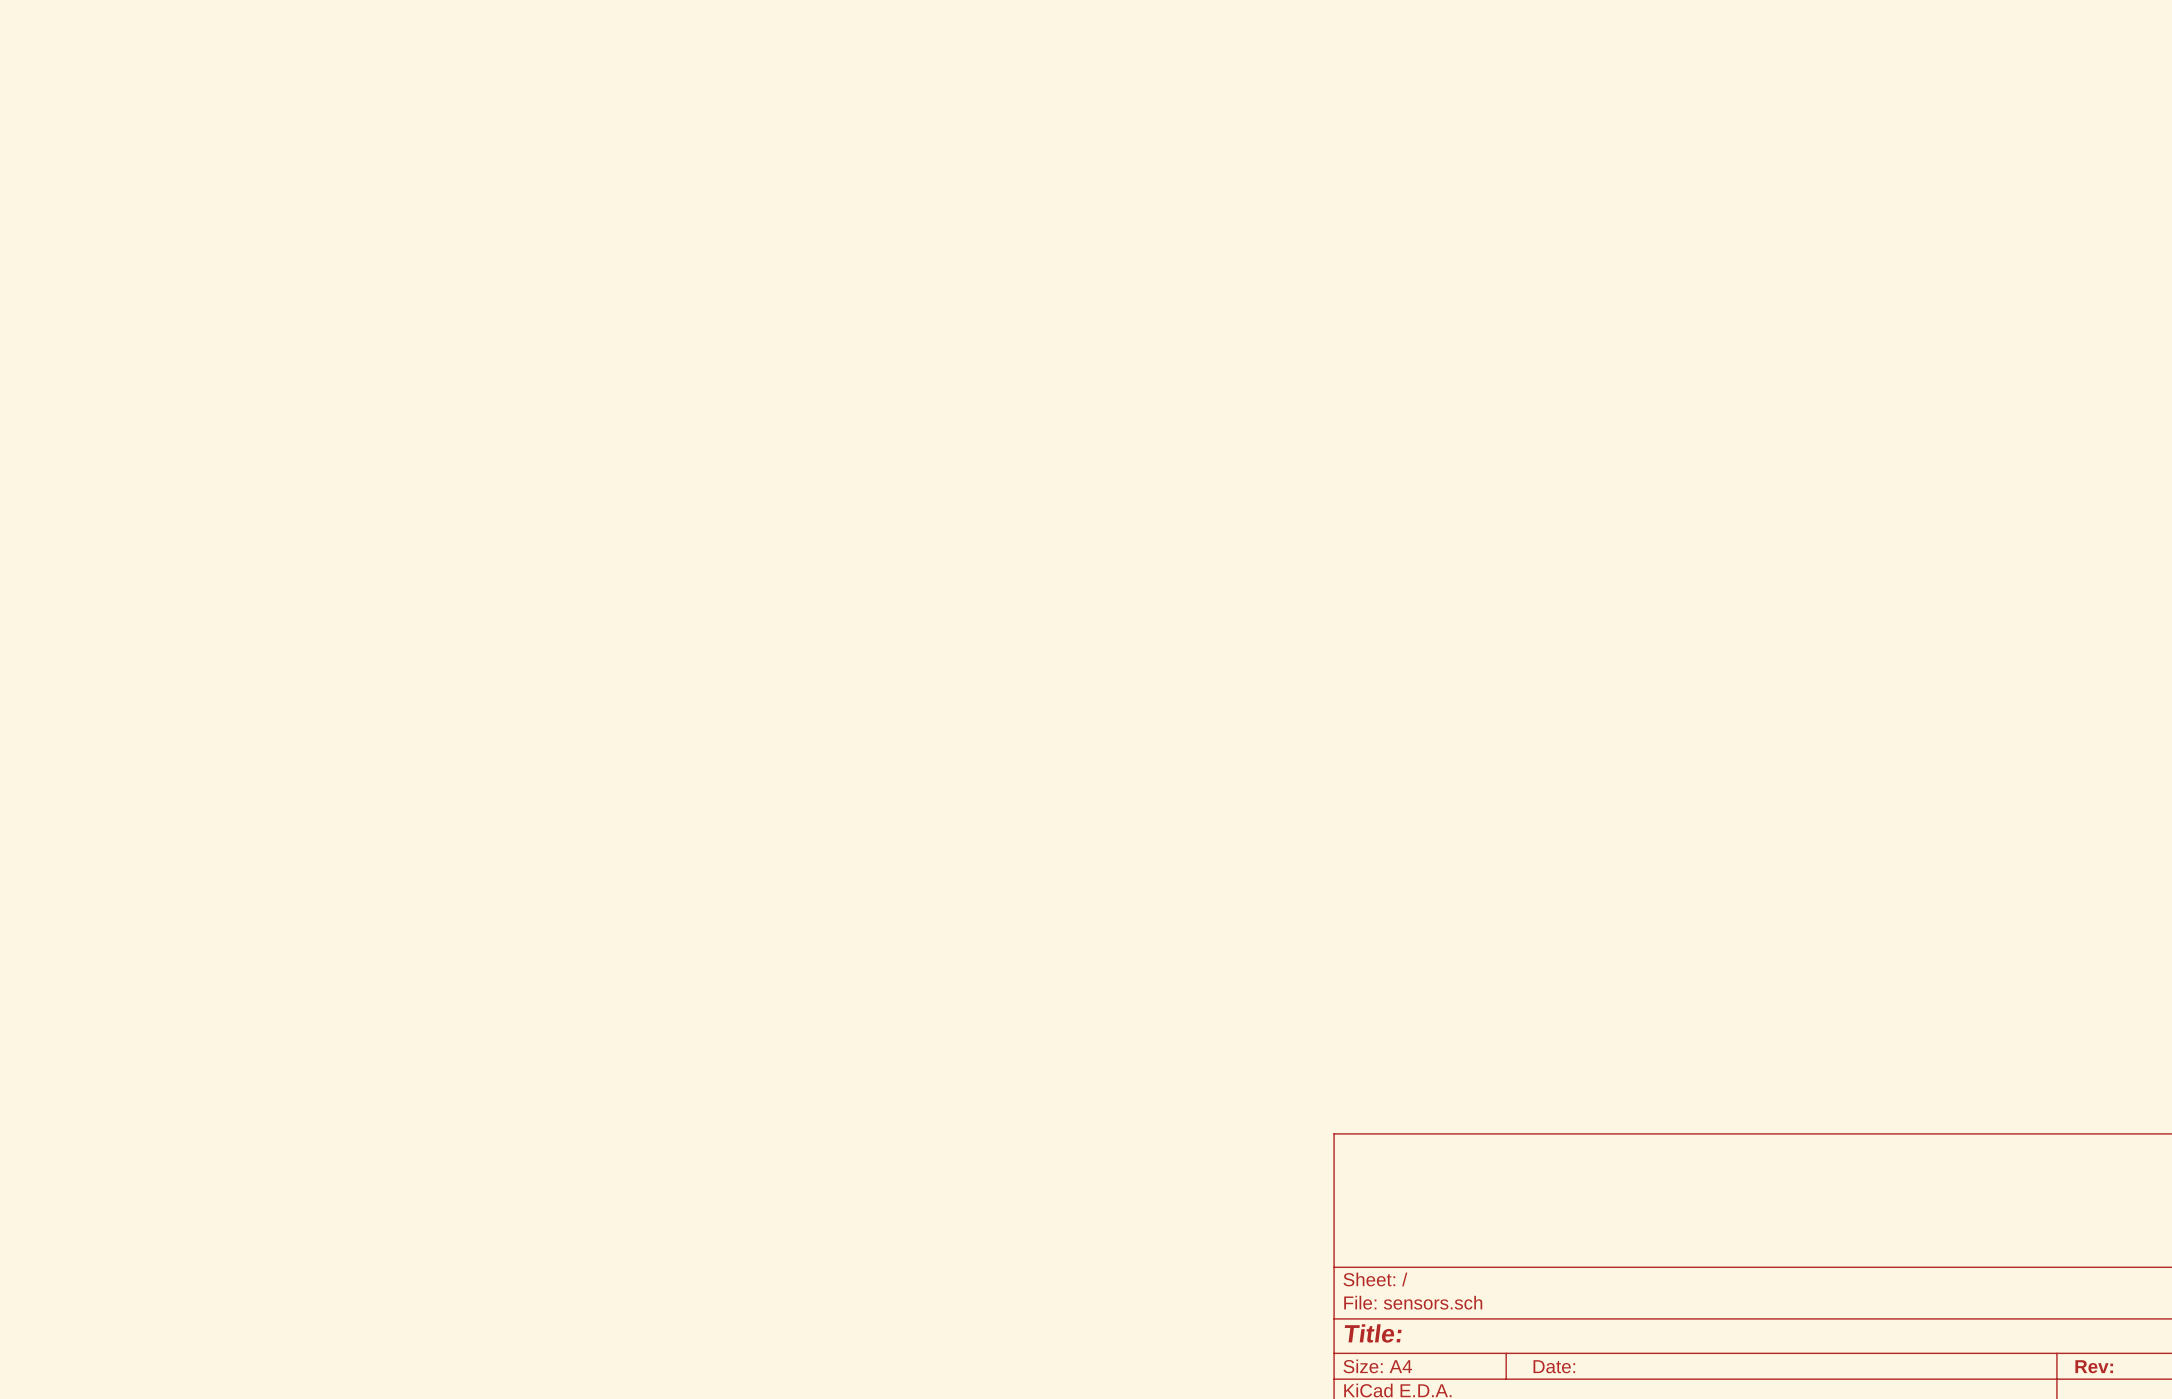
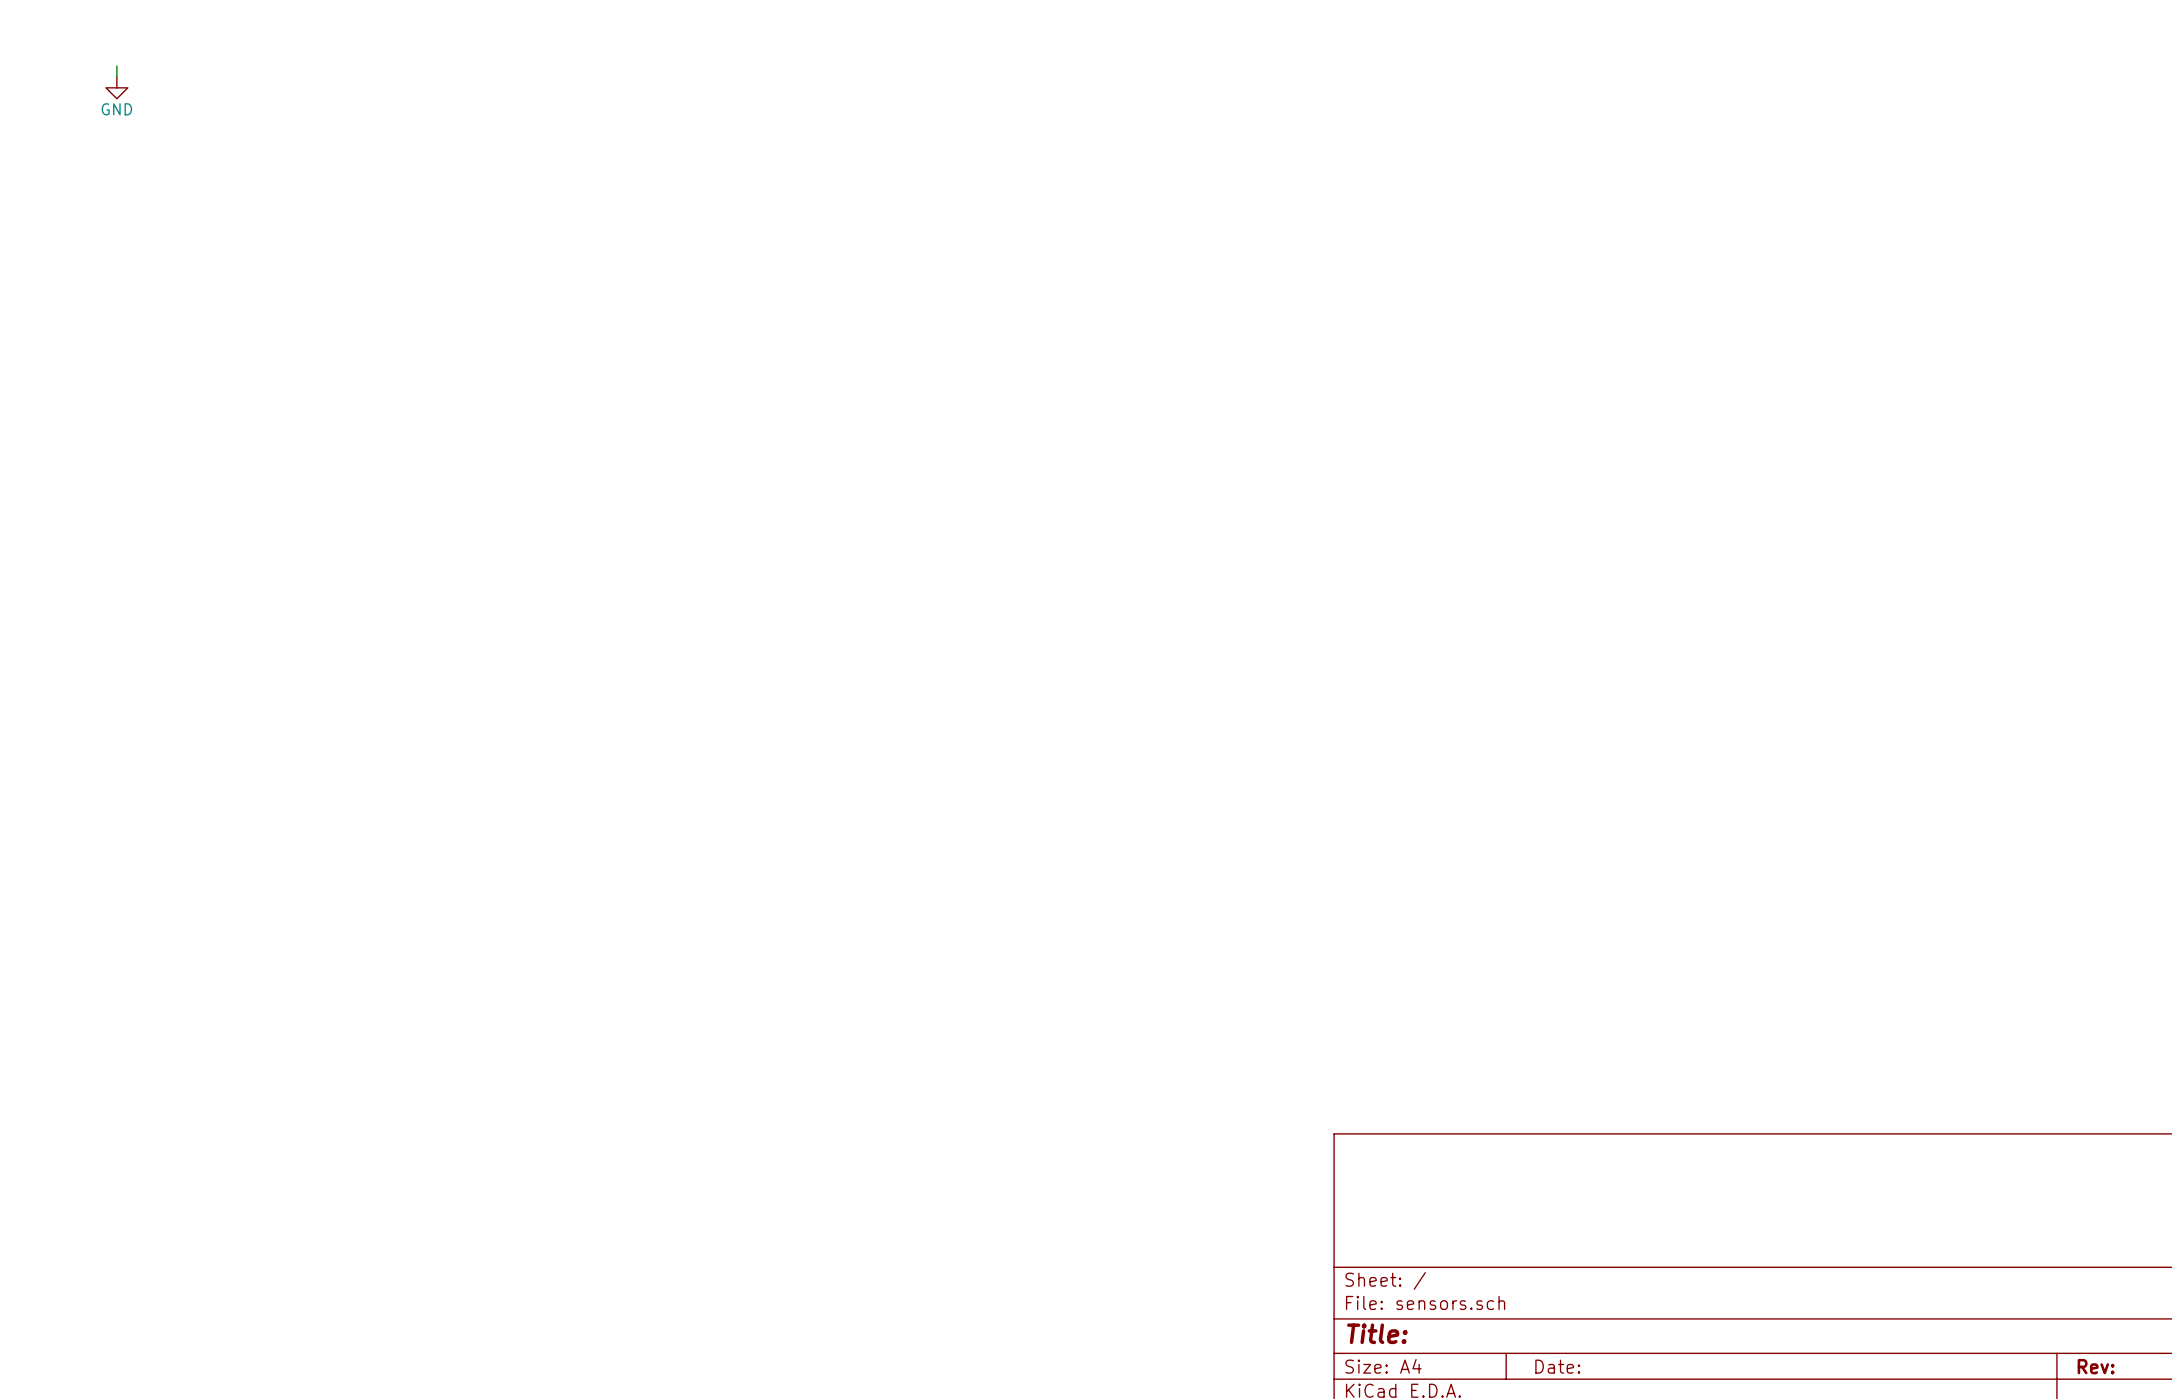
wire: none -> (116, 65) (116, 76)
power symbol: none -> GND (116, 87)

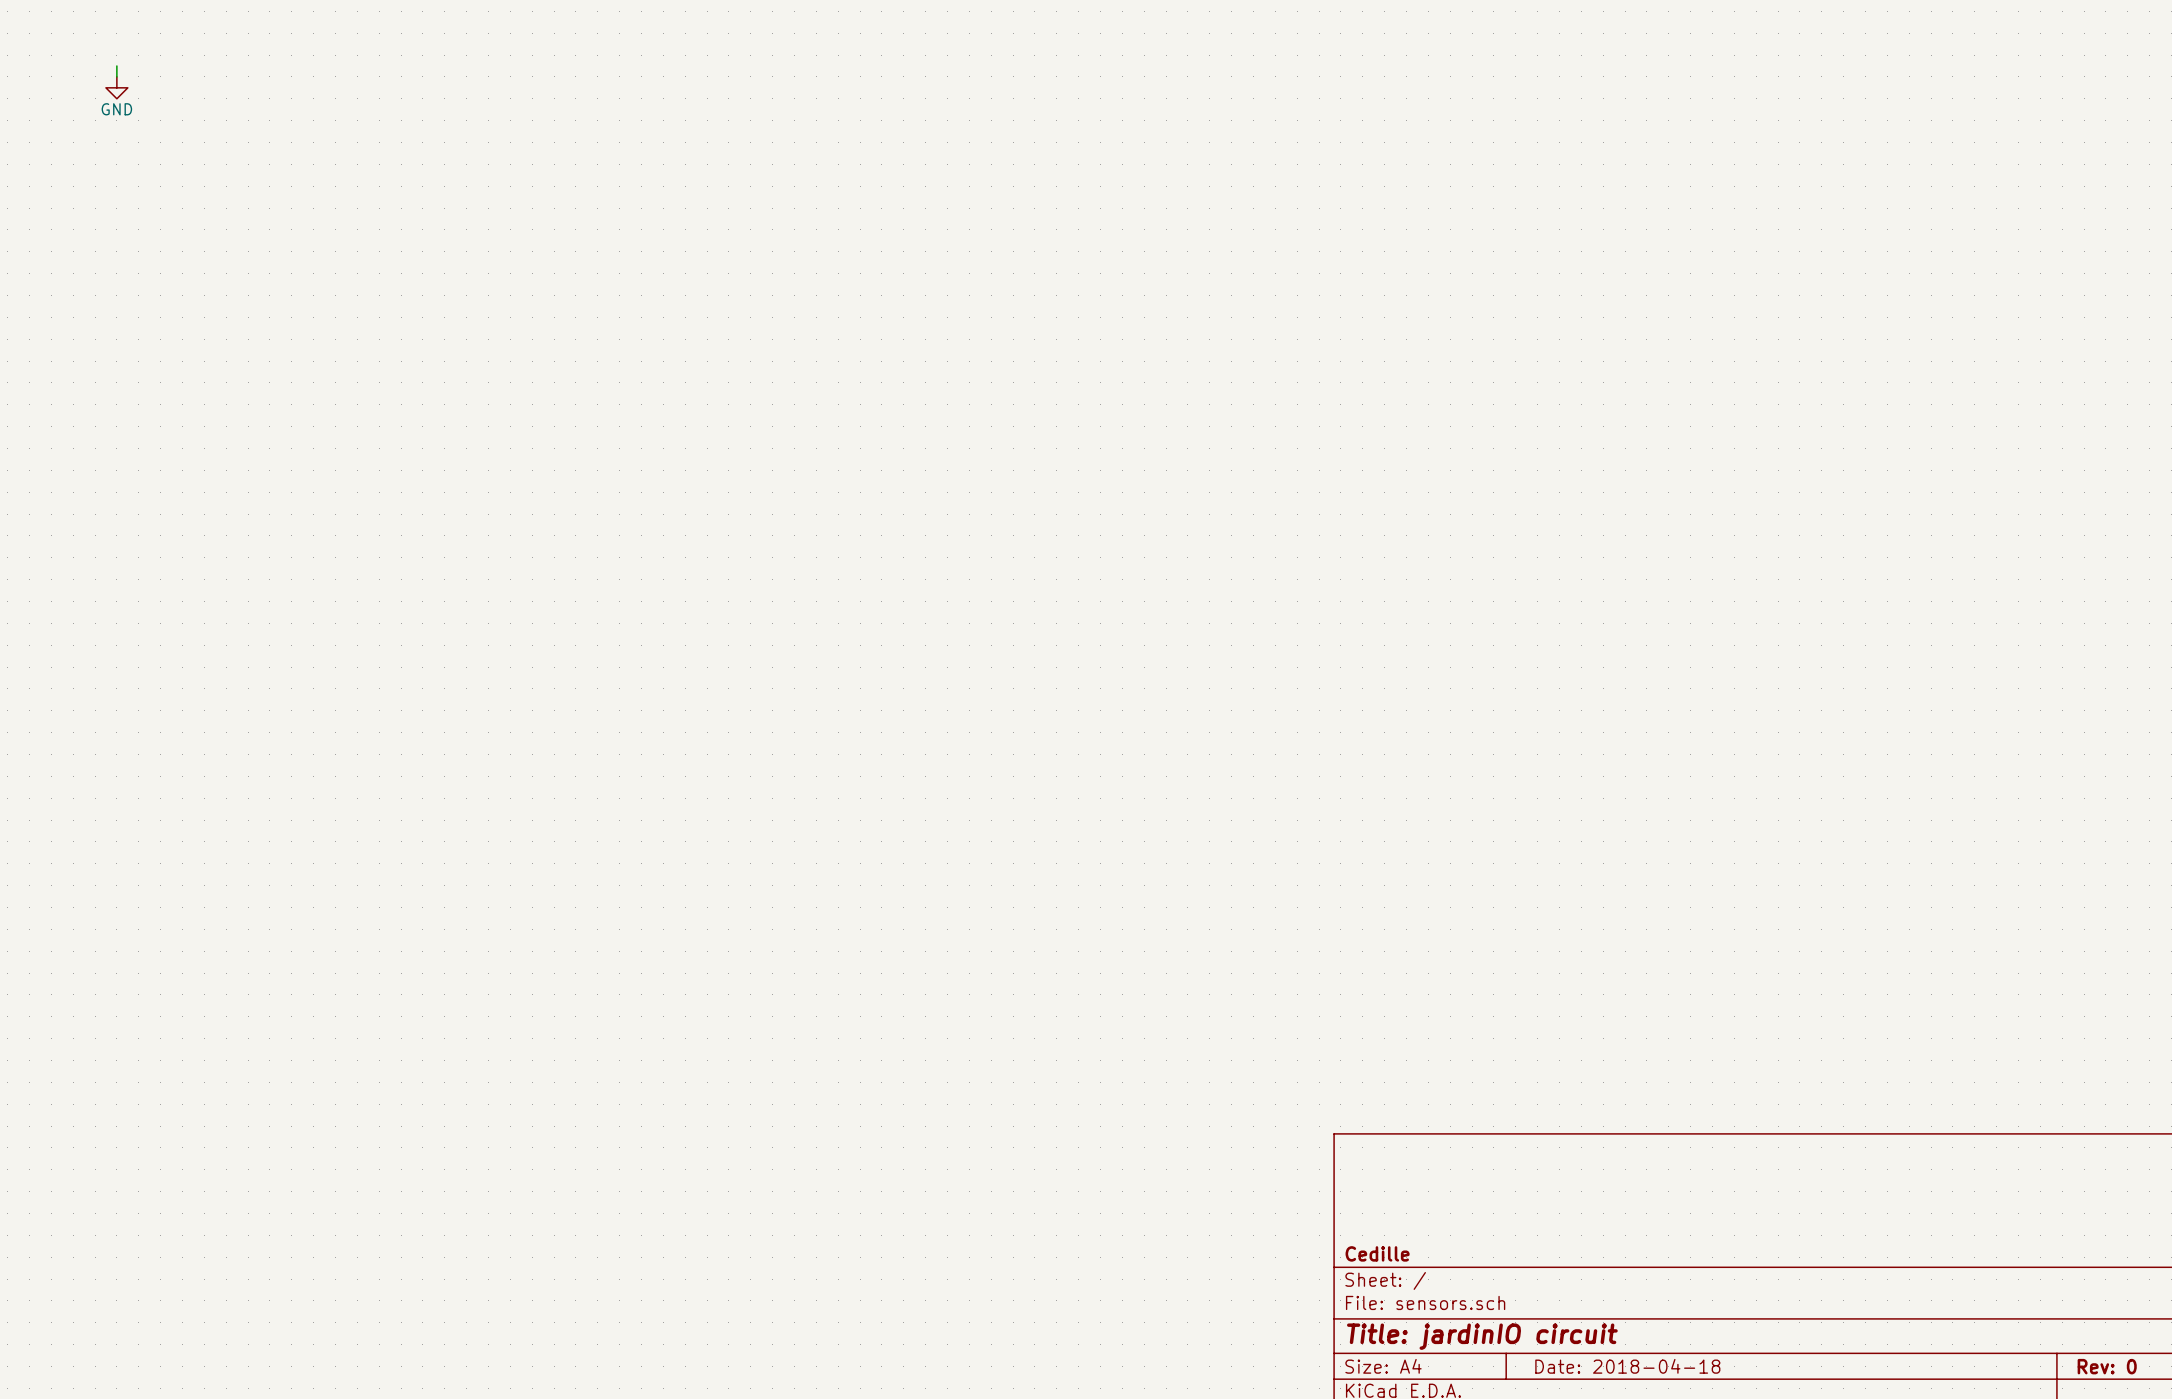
title block: none -> Cedille (1377, 1253)
title block: Title: (1377, 1333) -> Title: jardinIO circuit (1482, 1336)
title block: Date: (1557, 1366) -> Date: 2018-04-18 (1627, 1366)
title block: Rev: (2096, 1366) -> Rev: 0 (2107, 1366)

